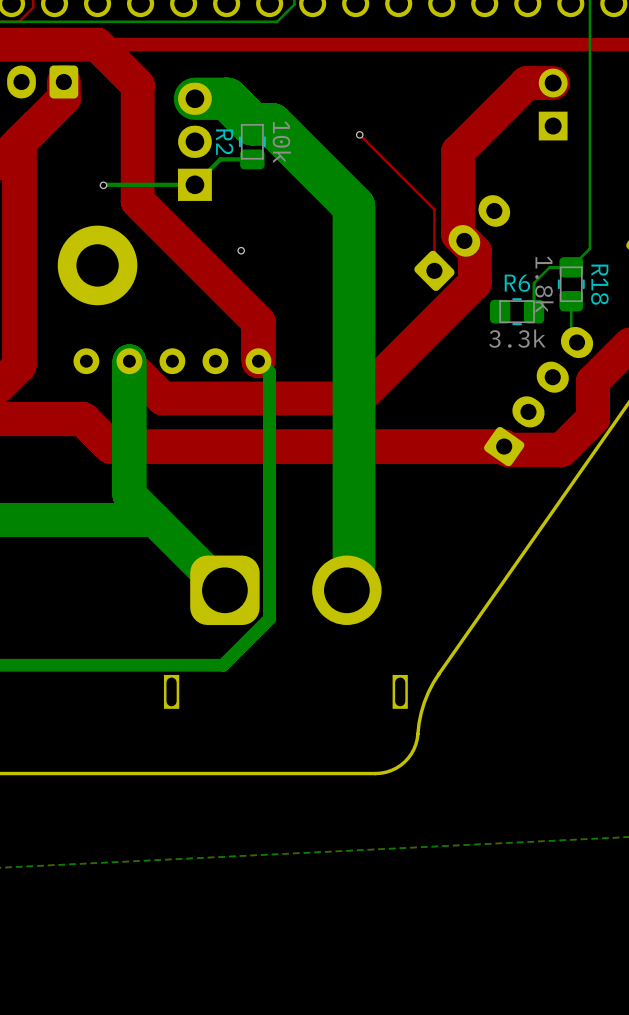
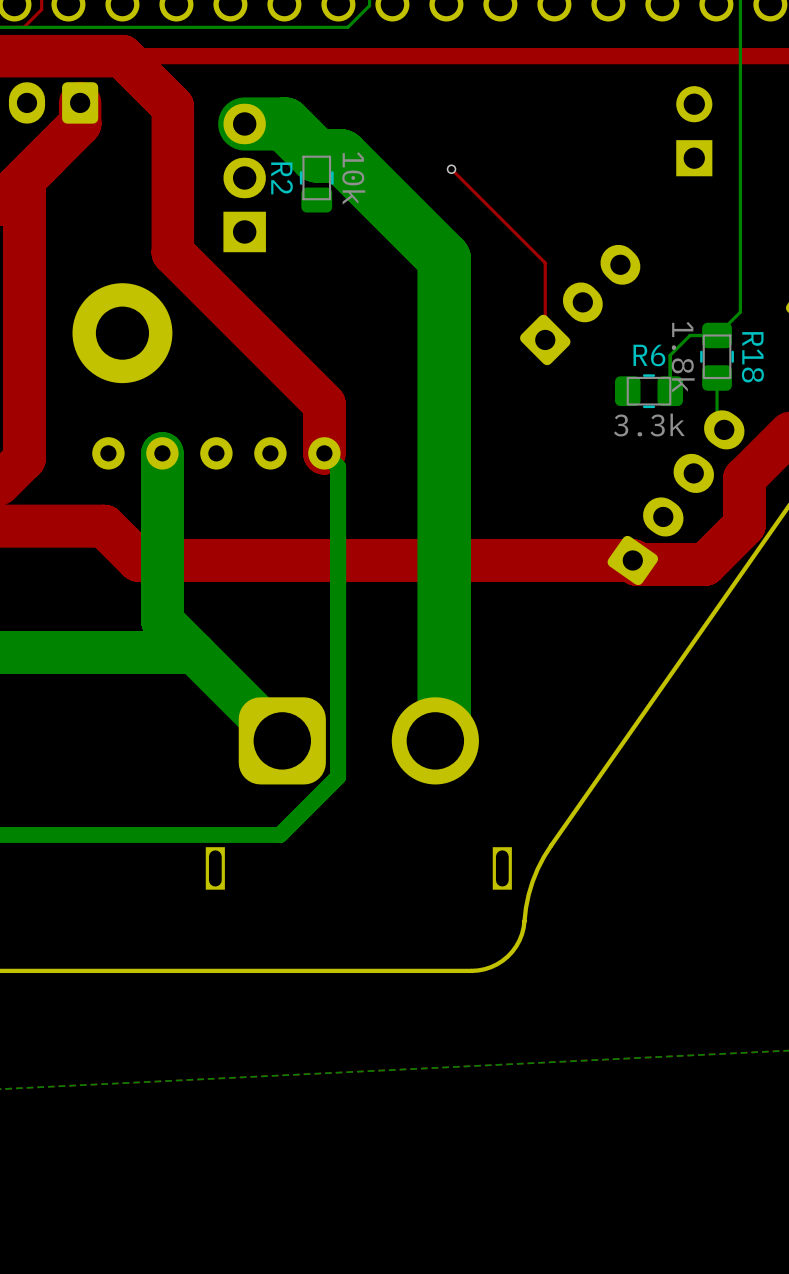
top track: (553, 83) (526, 83) (458, 151) (458, 234) (474, 251) (474, 282) (358, 398) (162, 398) (129, 365) (129, 361) -> none
bottom track: (252, 159) (220, 159) (194, 184) (103, 185) -> none
via: (103, 185) -> none
via: (241, 250) -> none

